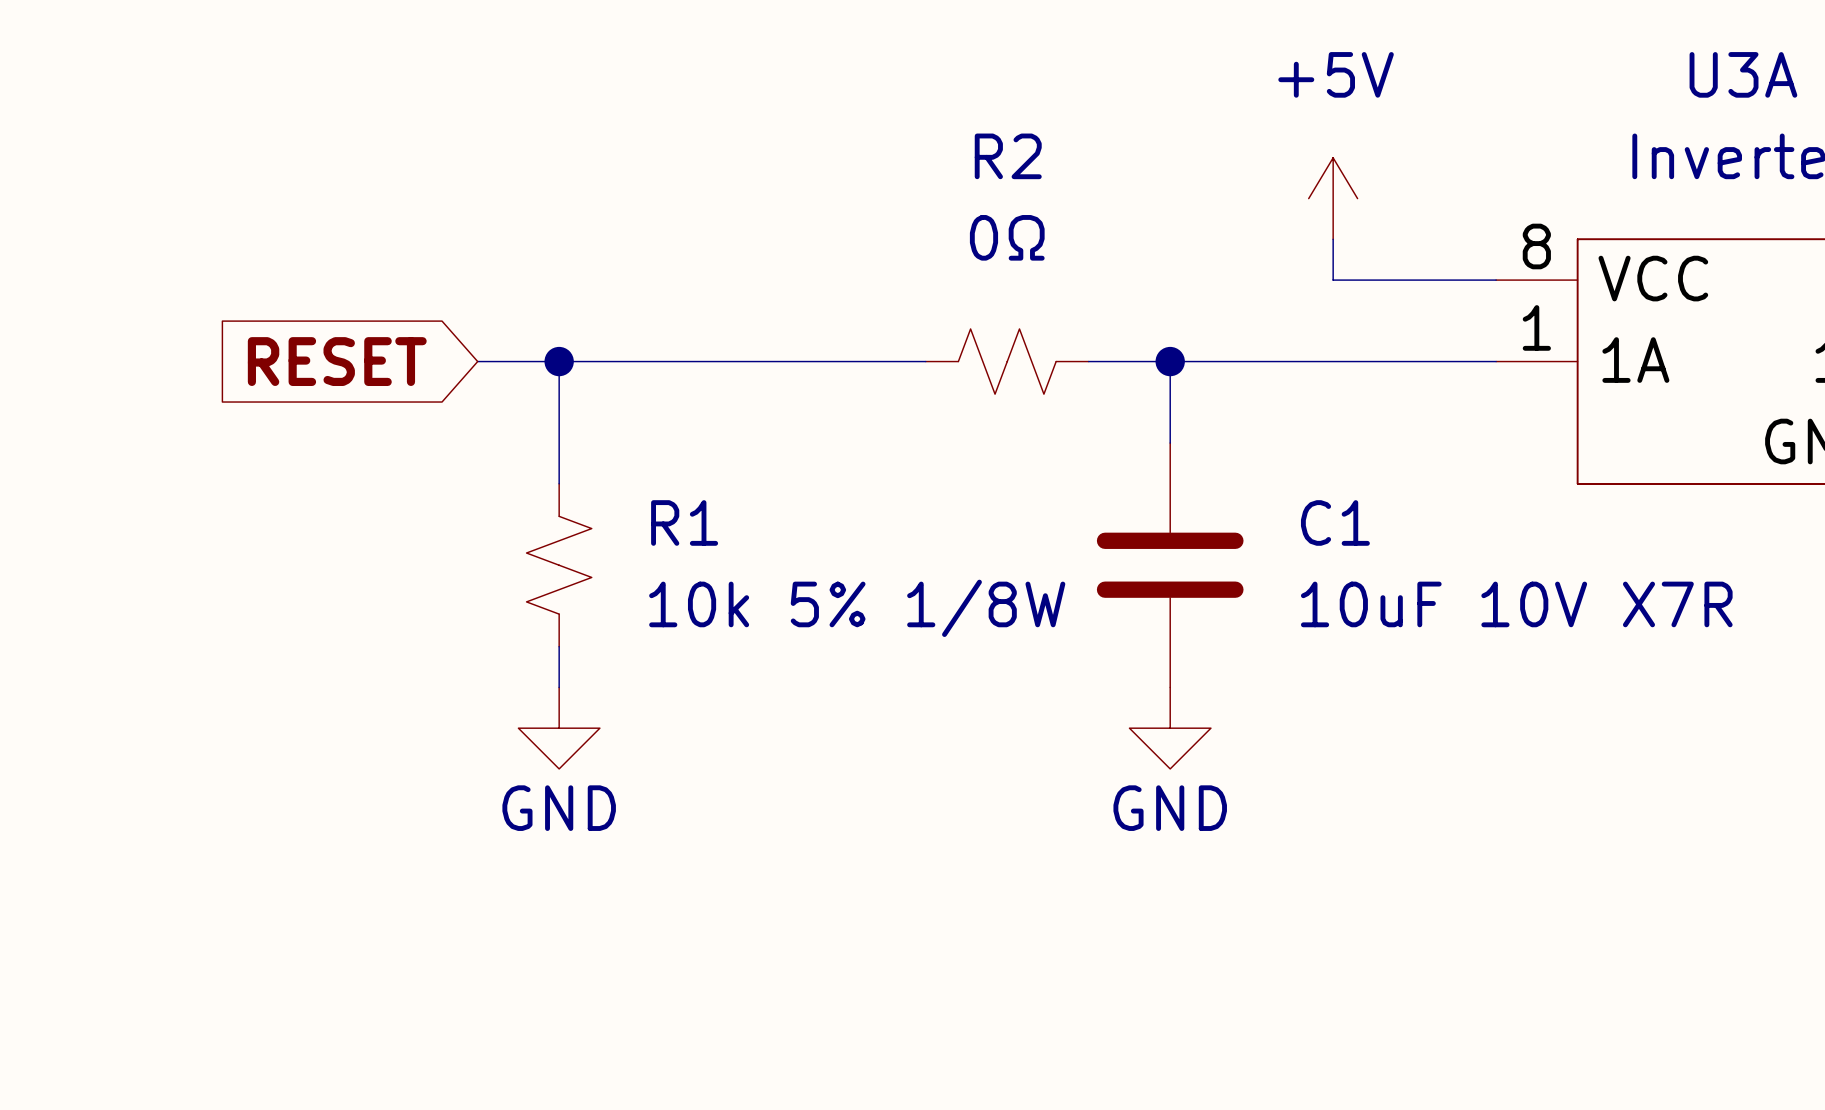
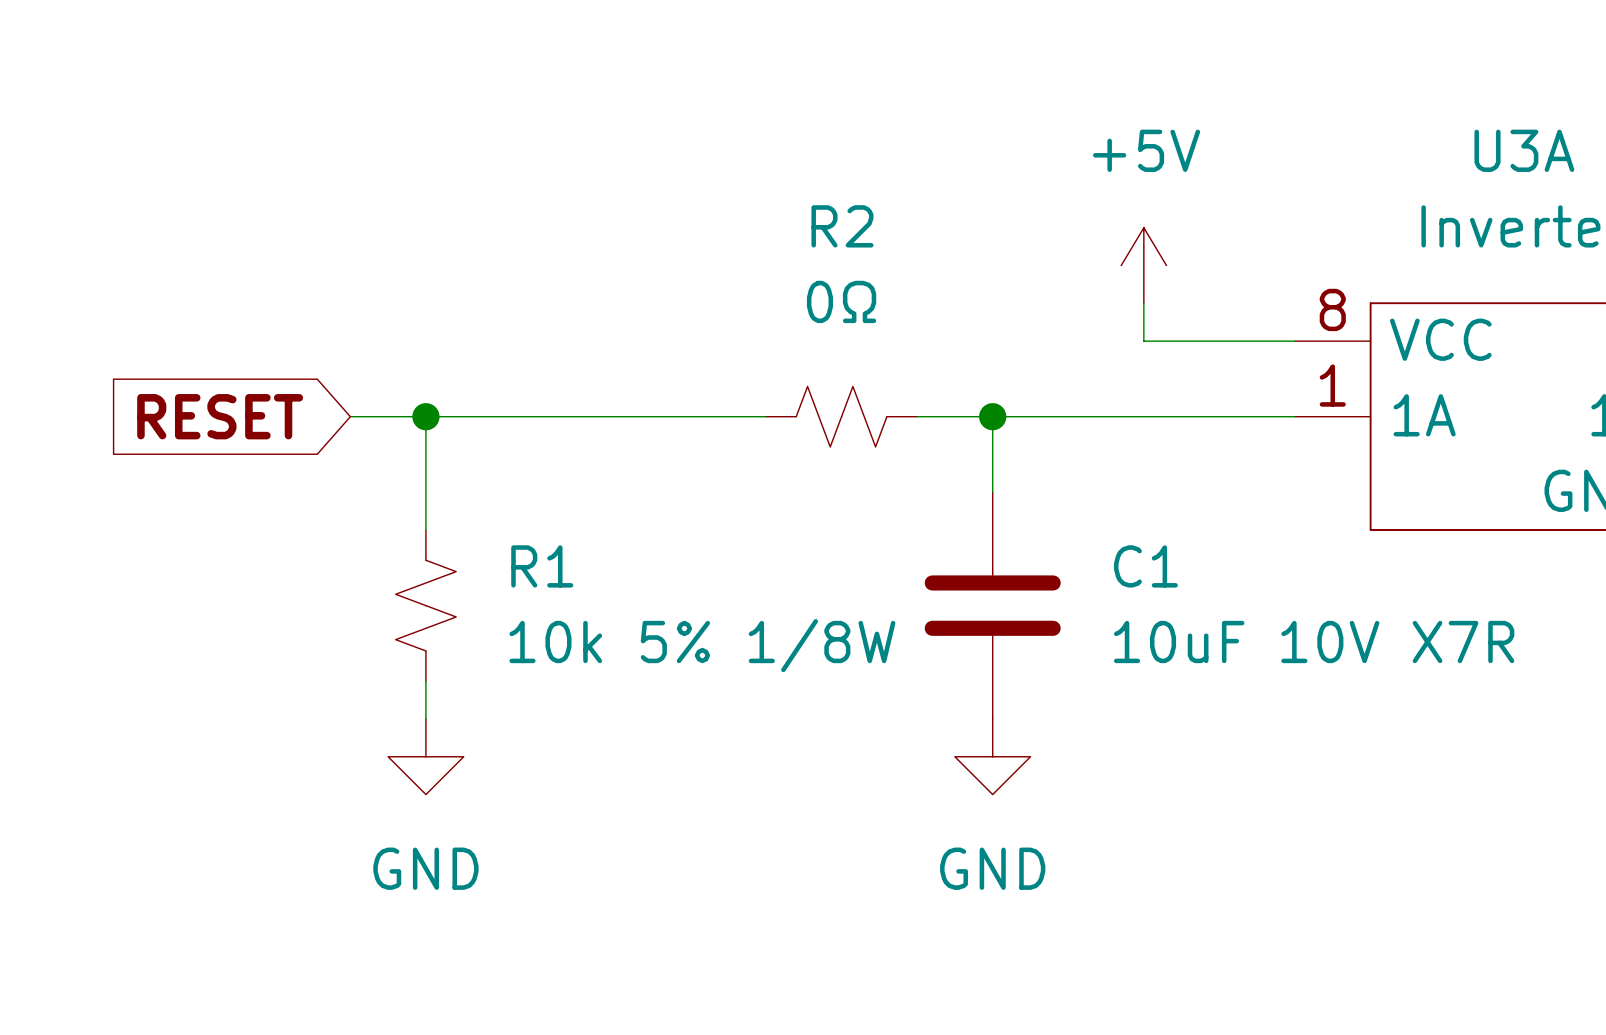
power symbol text position: GND (559, 808) -> GND (425, 868)
power symbol text position: GND (1170, 808) -> GND (992, 868)

